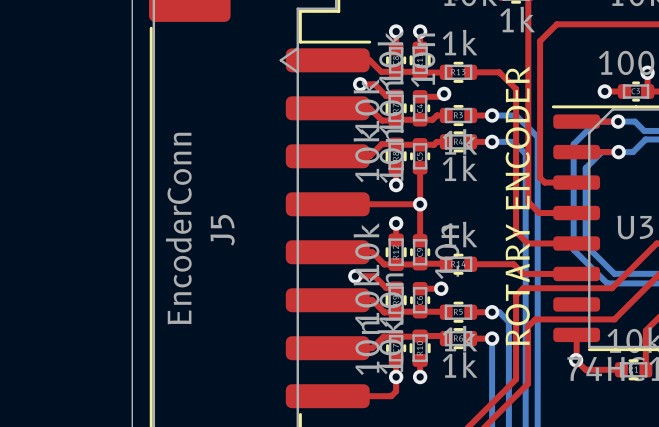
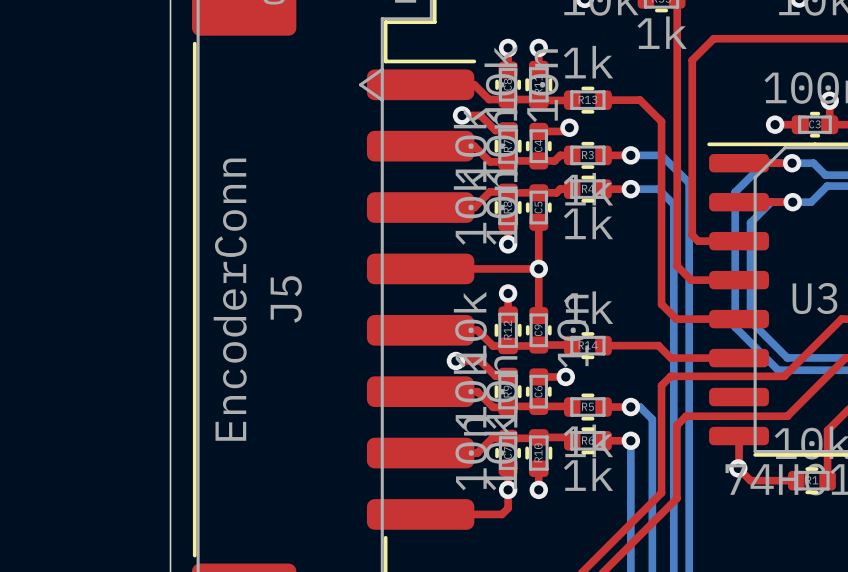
text: ROTARY ENCODER (517, 205) -> none

